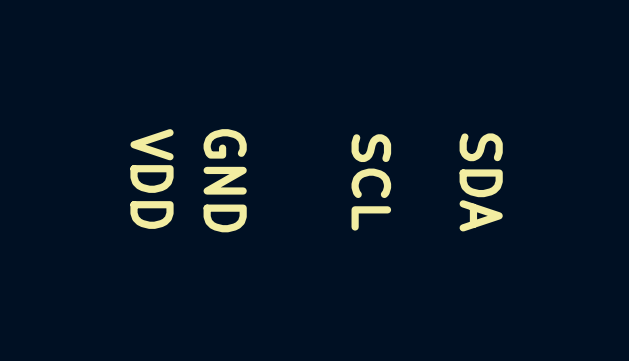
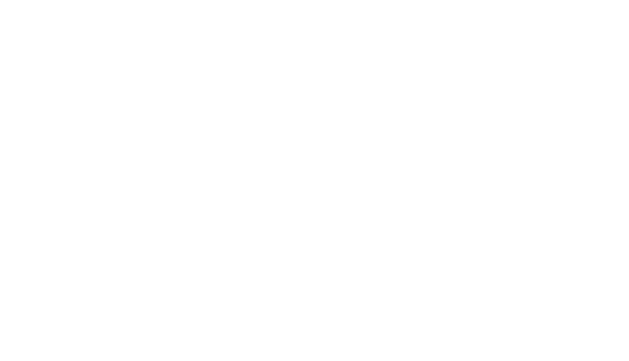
text: VDD (152, 179) -> none
text: GND (225, 180) -> none
text: SCL (371, 182) -> none
text: SDA (481, 182) -> none

